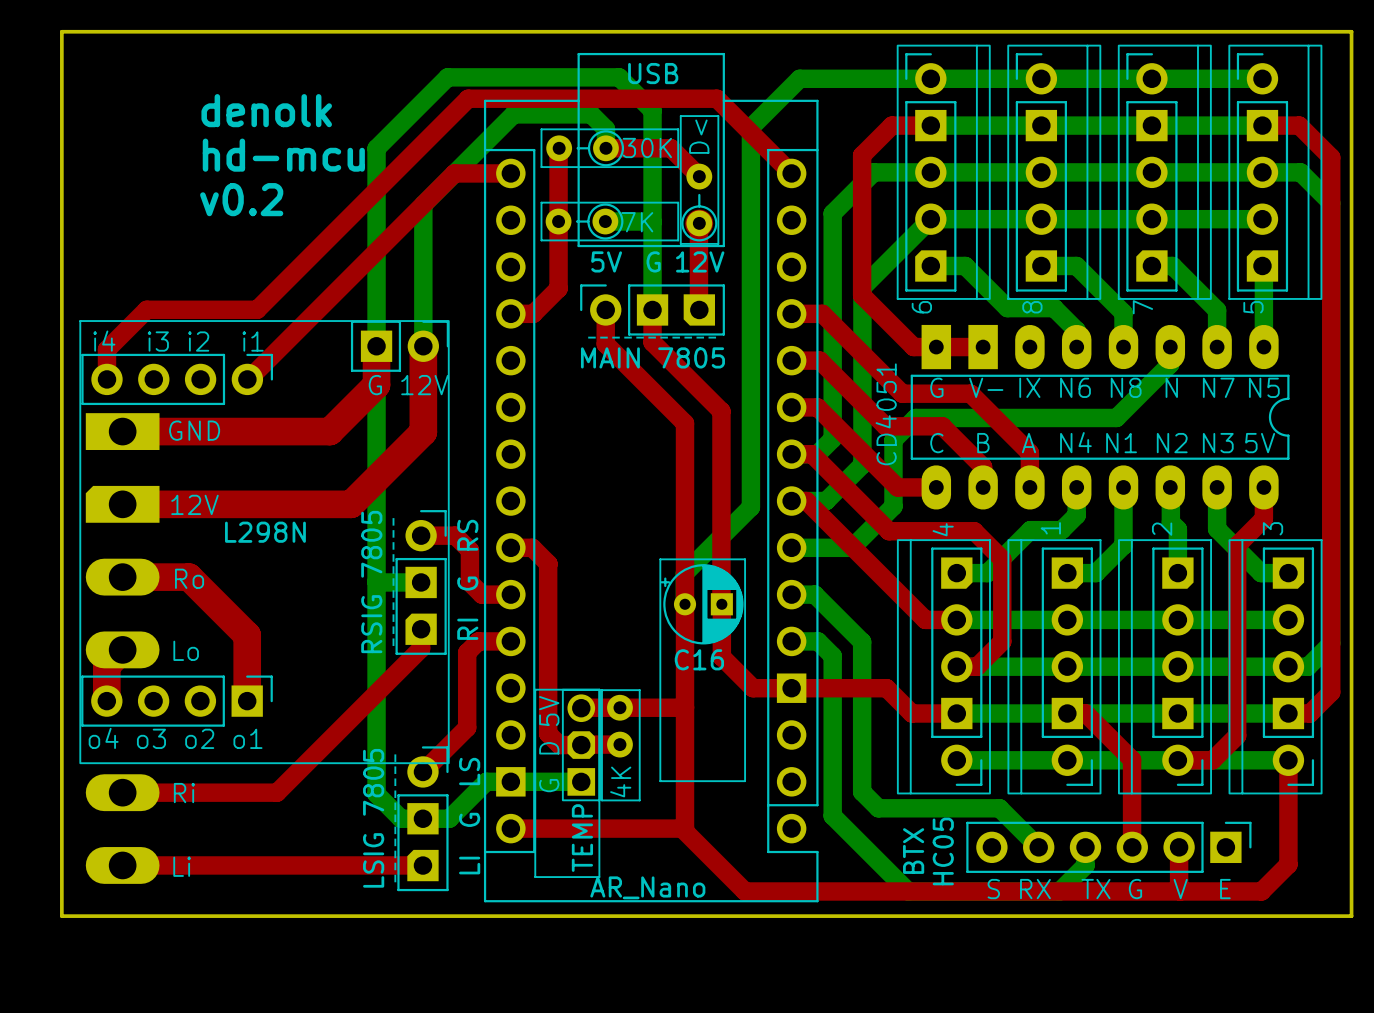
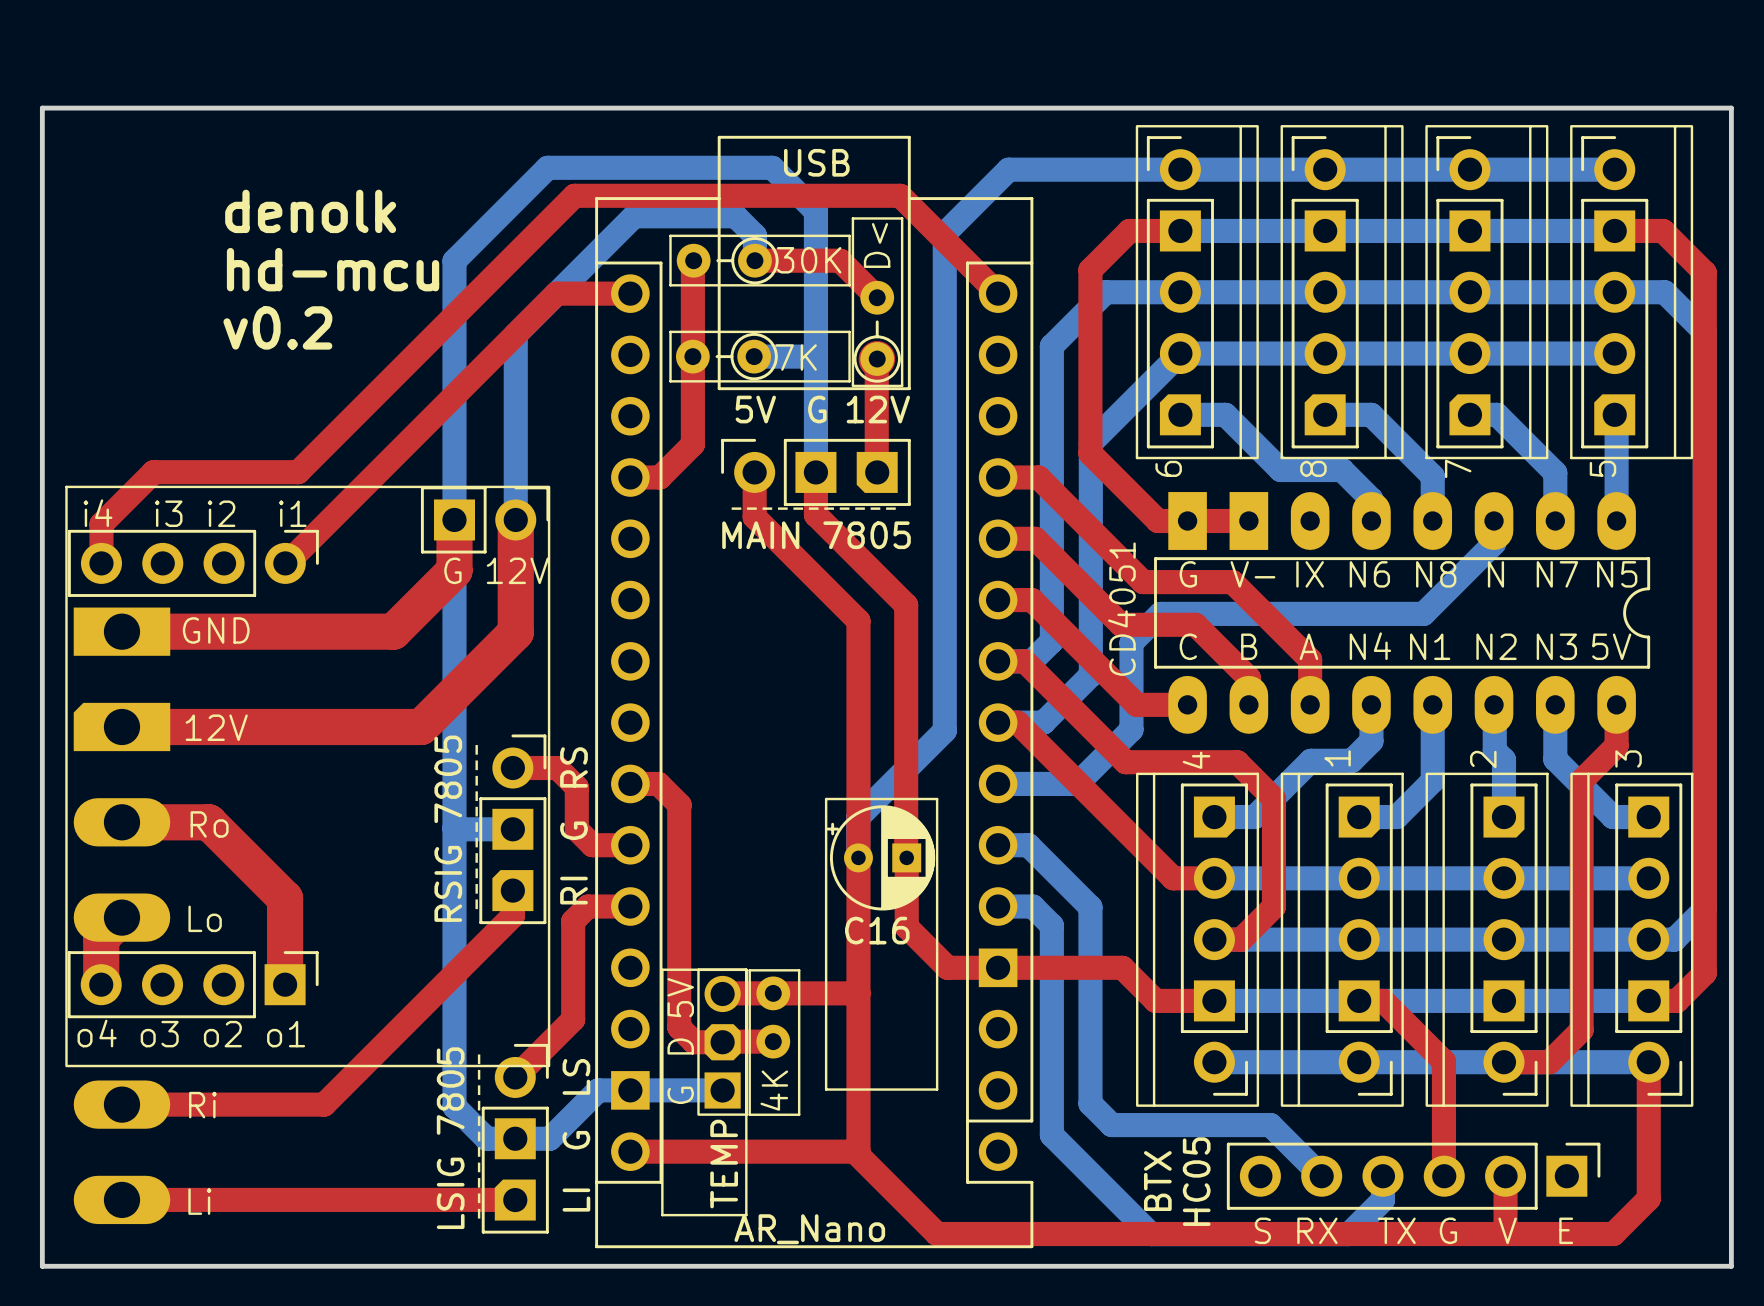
part value: L298N (265, 532) -> none

